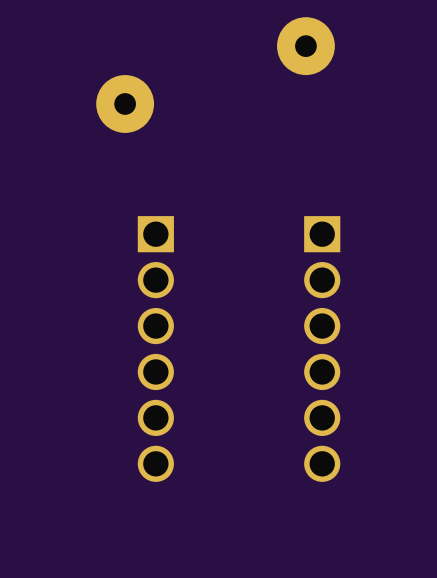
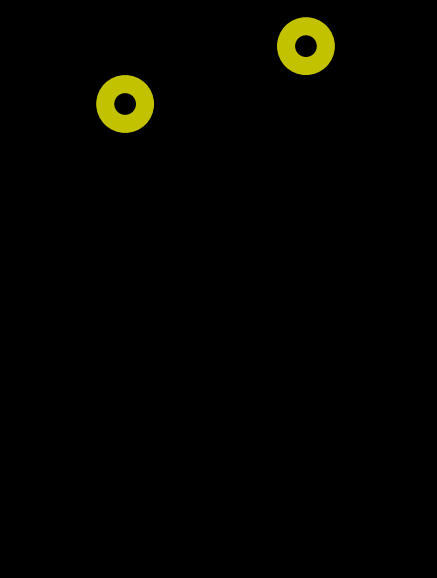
part: (155, 349) -> none
part: (322, 349) -> none

